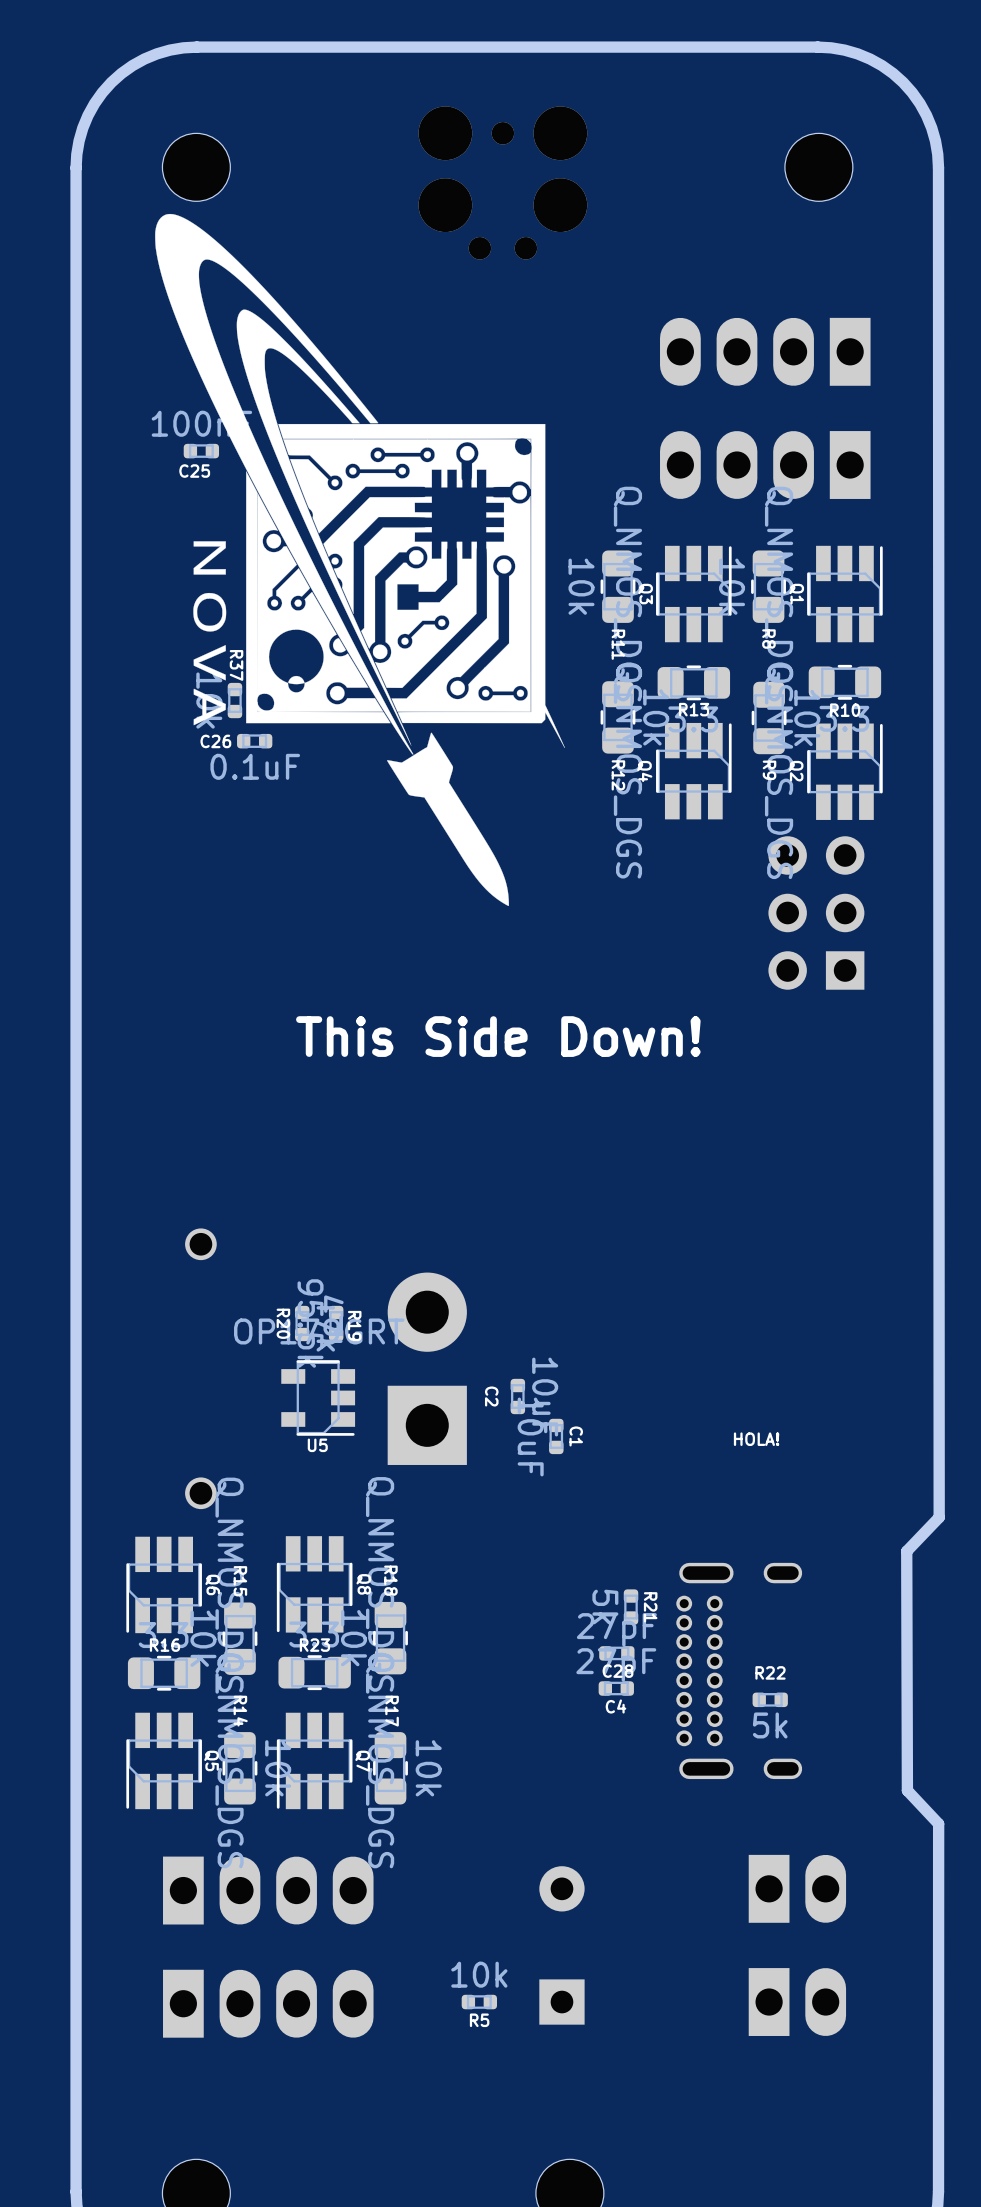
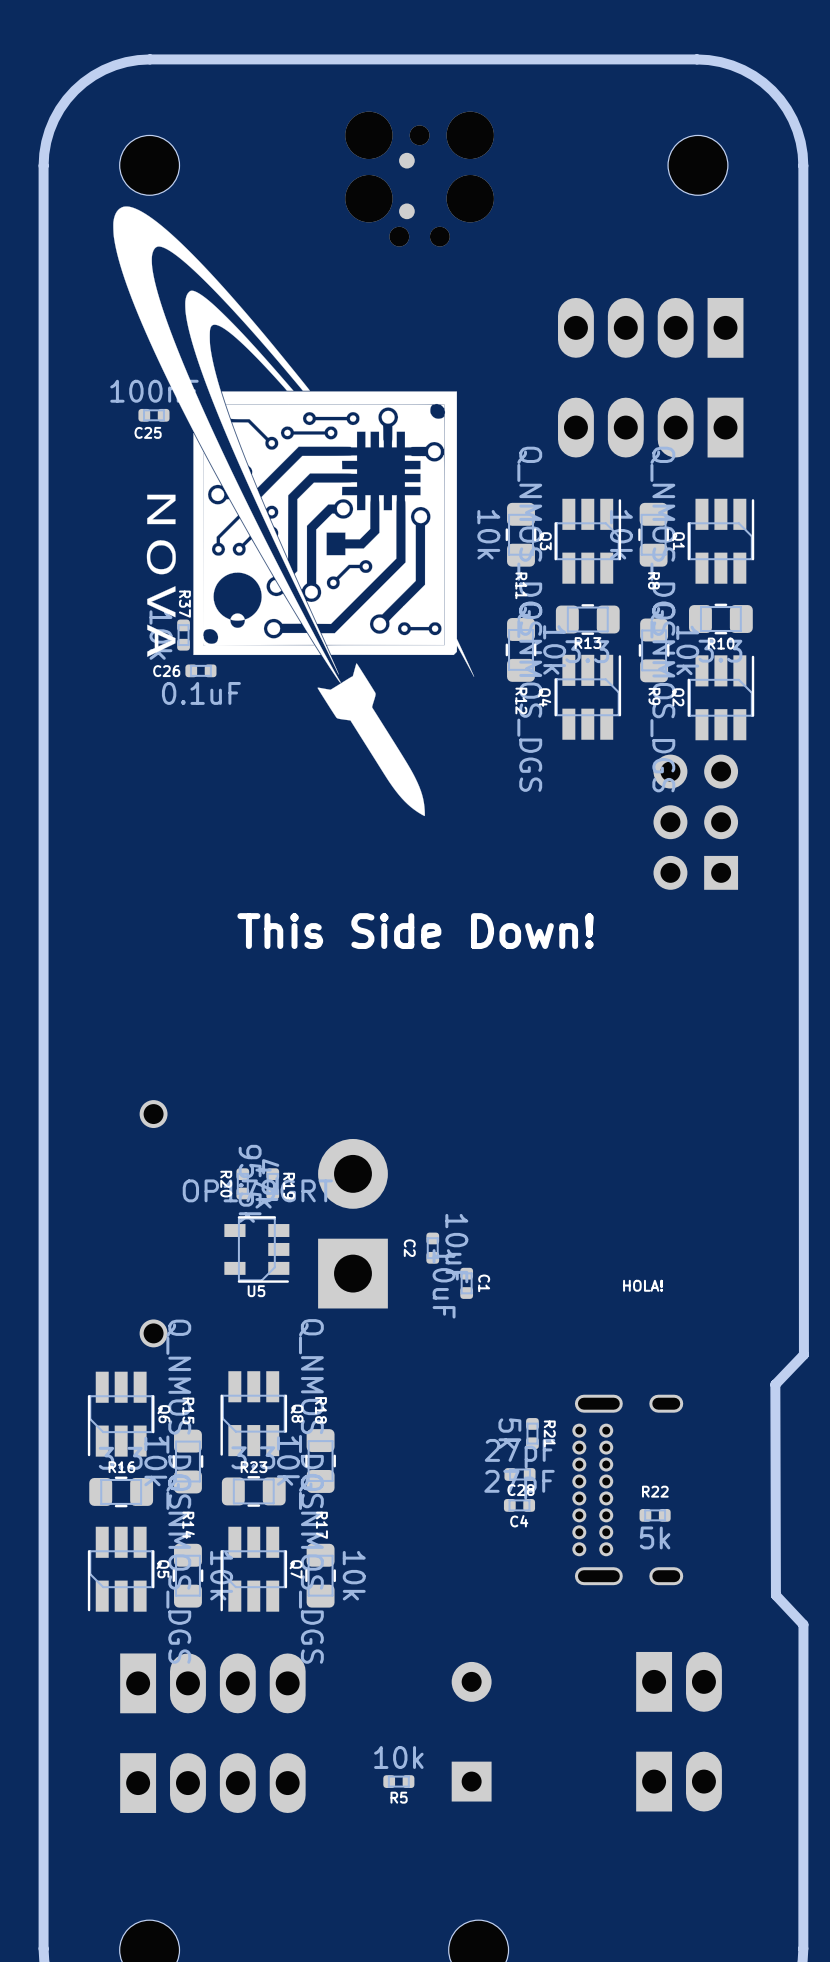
part footprint: [418, 106, 588, 260] -> [345, 111, 494, 247]

